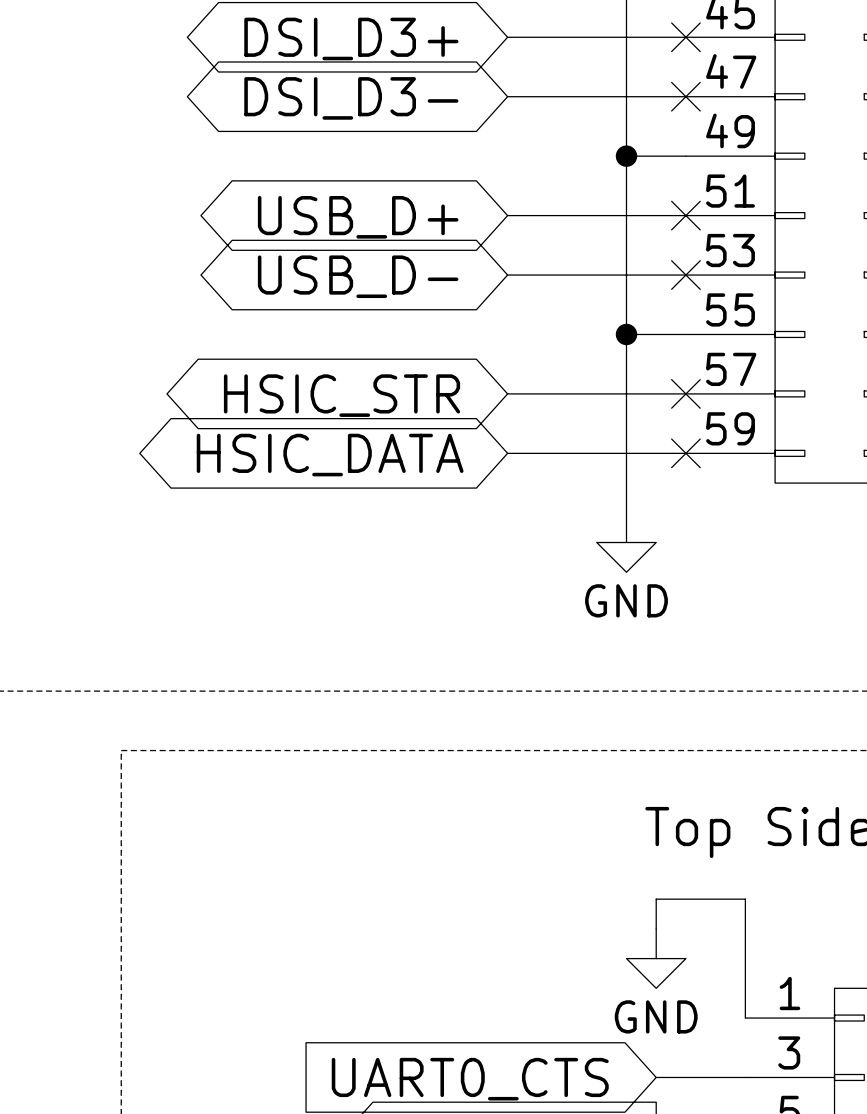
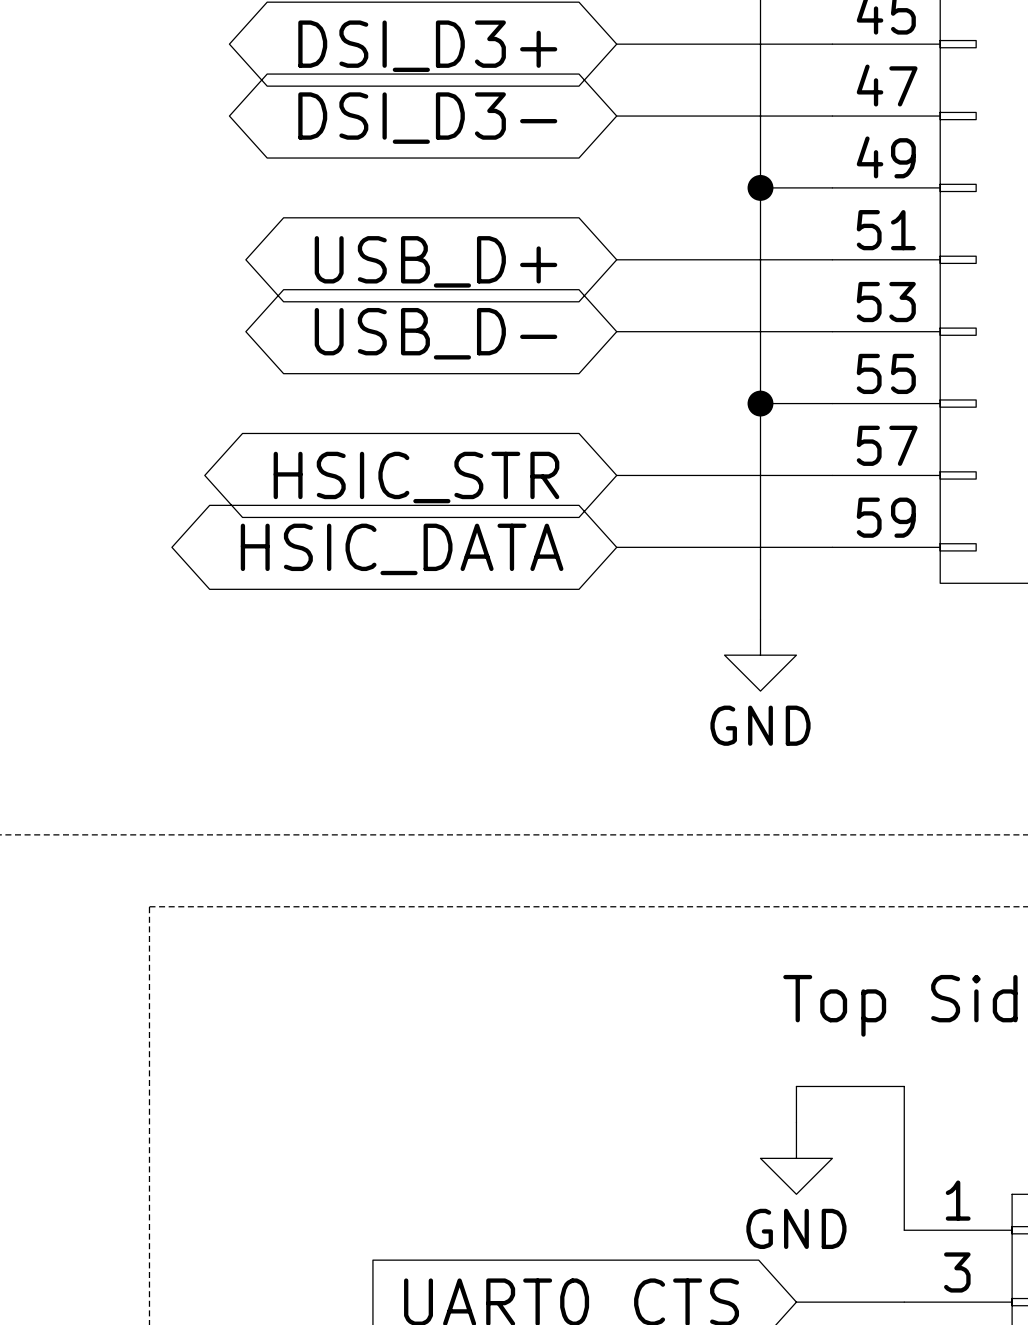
no-connect mark: (685, 37) -> none
no-connect mark: (685, 96) -> none
no-connect mark: (685, 215) -> none
no-connect mark: (685, 275) -> none
no-connect mark: (685, 393) -> none
no-connect mark: (685, 453) -> none

